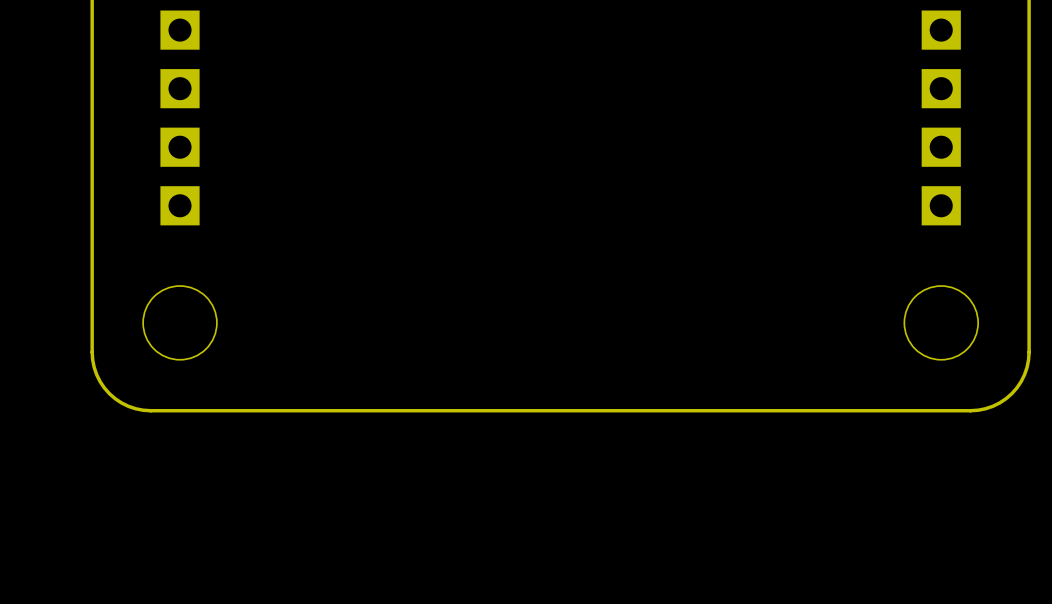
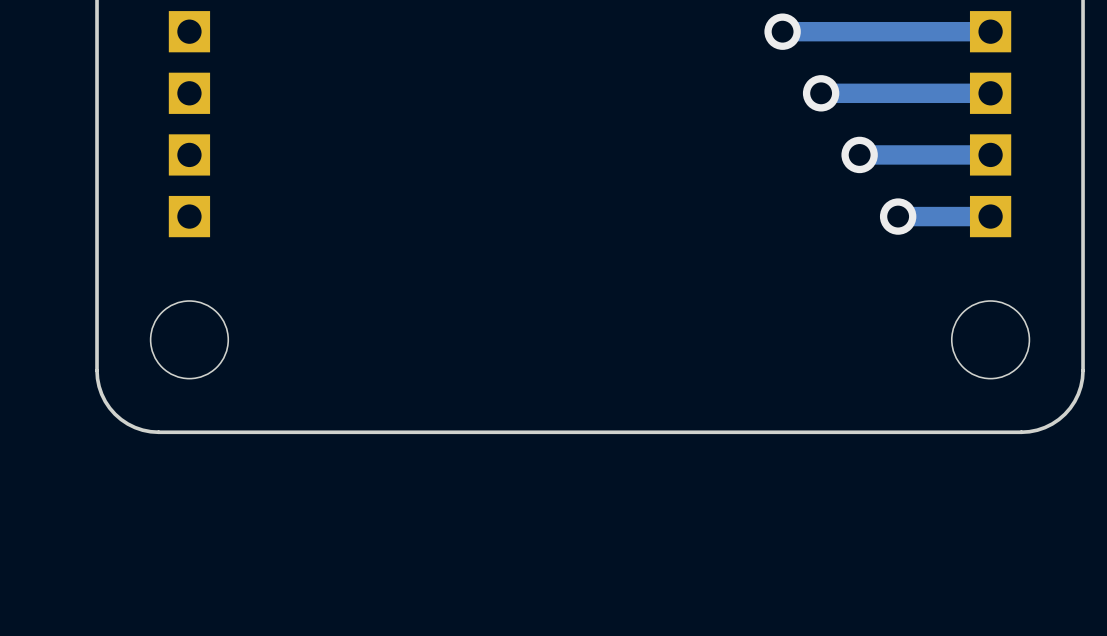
via: none -> (782, 31)
track: none -> (990, 31) (782, 31)
via: none -> (821, 93)
track: none -> (990, 93) (821, 93)
via: none -> (859, 154)
track: none -> (990, 154) (859, 154)
via: none -> (898, 216)
track: none -> (990, 216) (898, 216)

